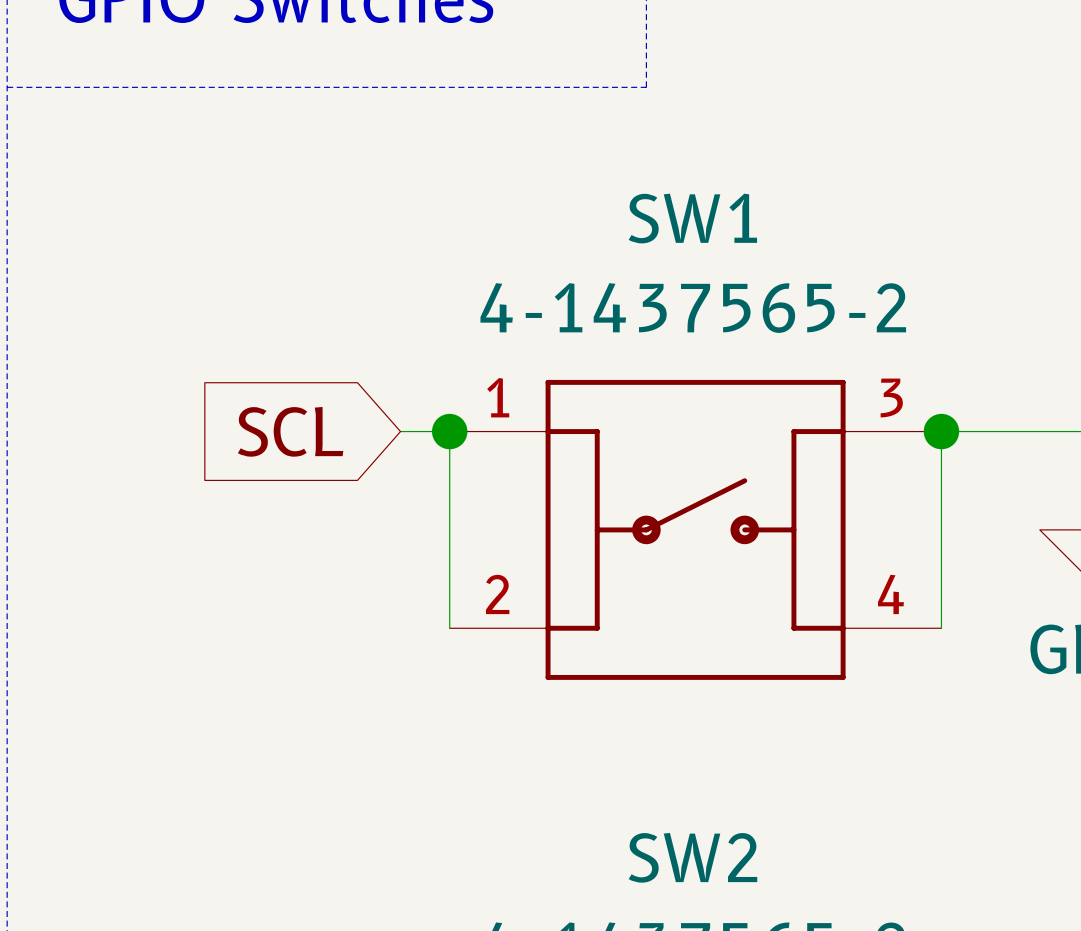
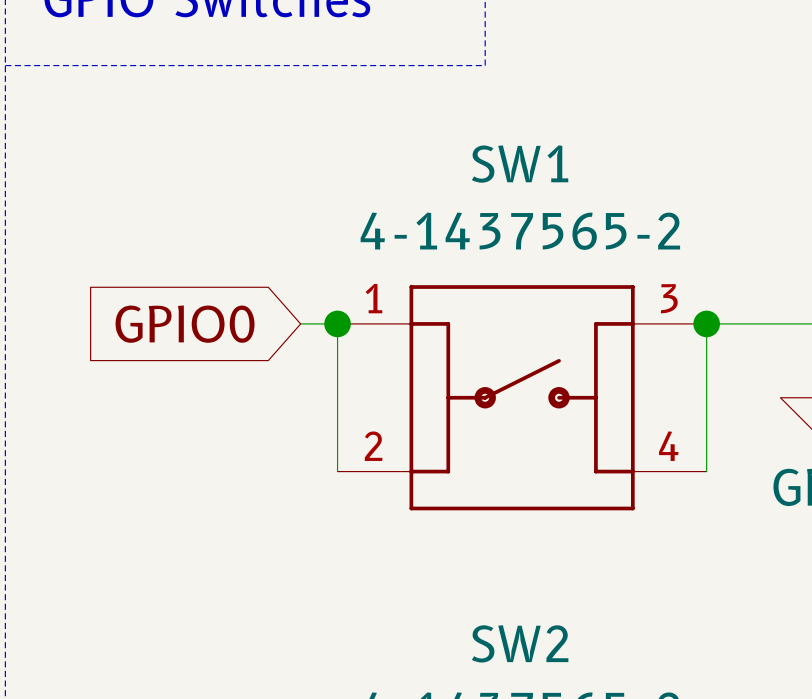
global label: SCL (290, 431) -> GPIO0 (185, 324)

